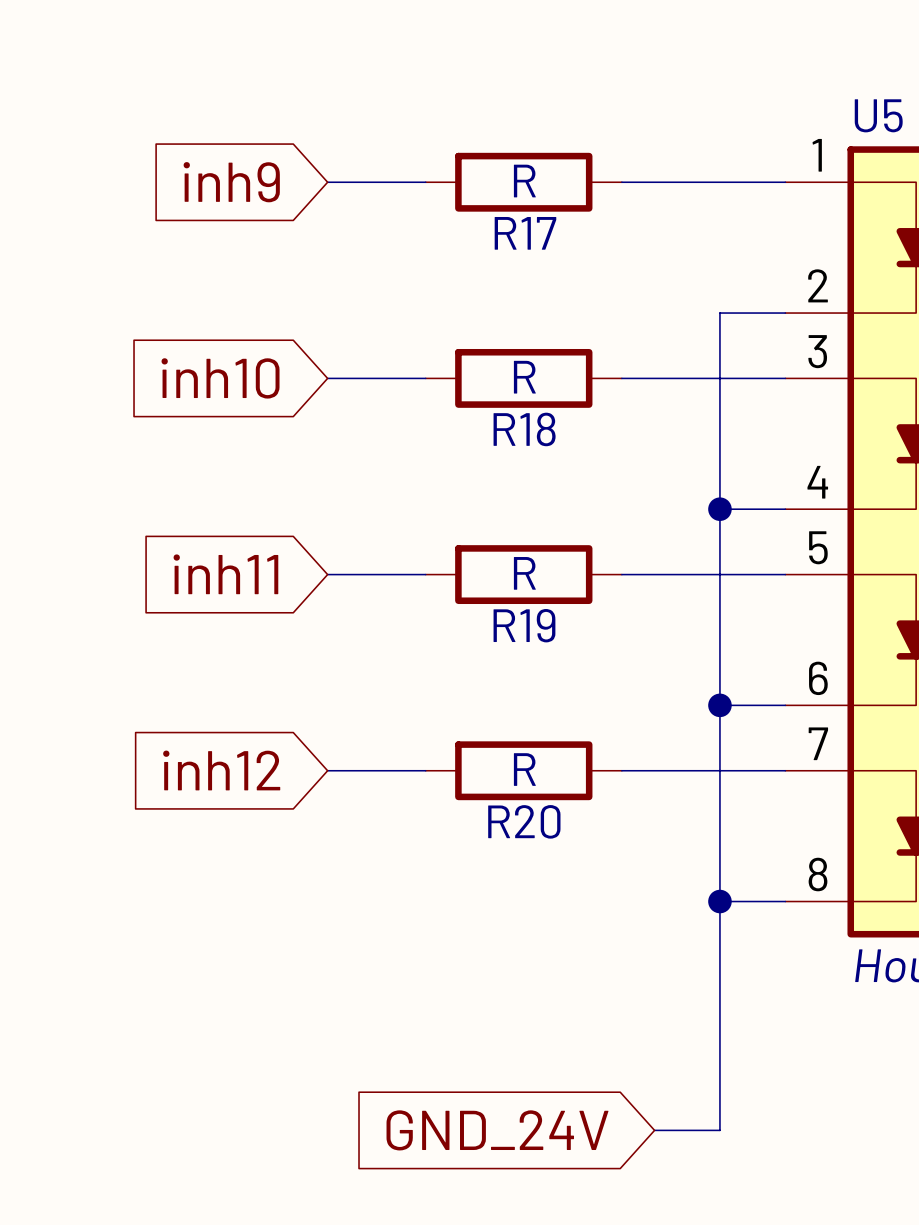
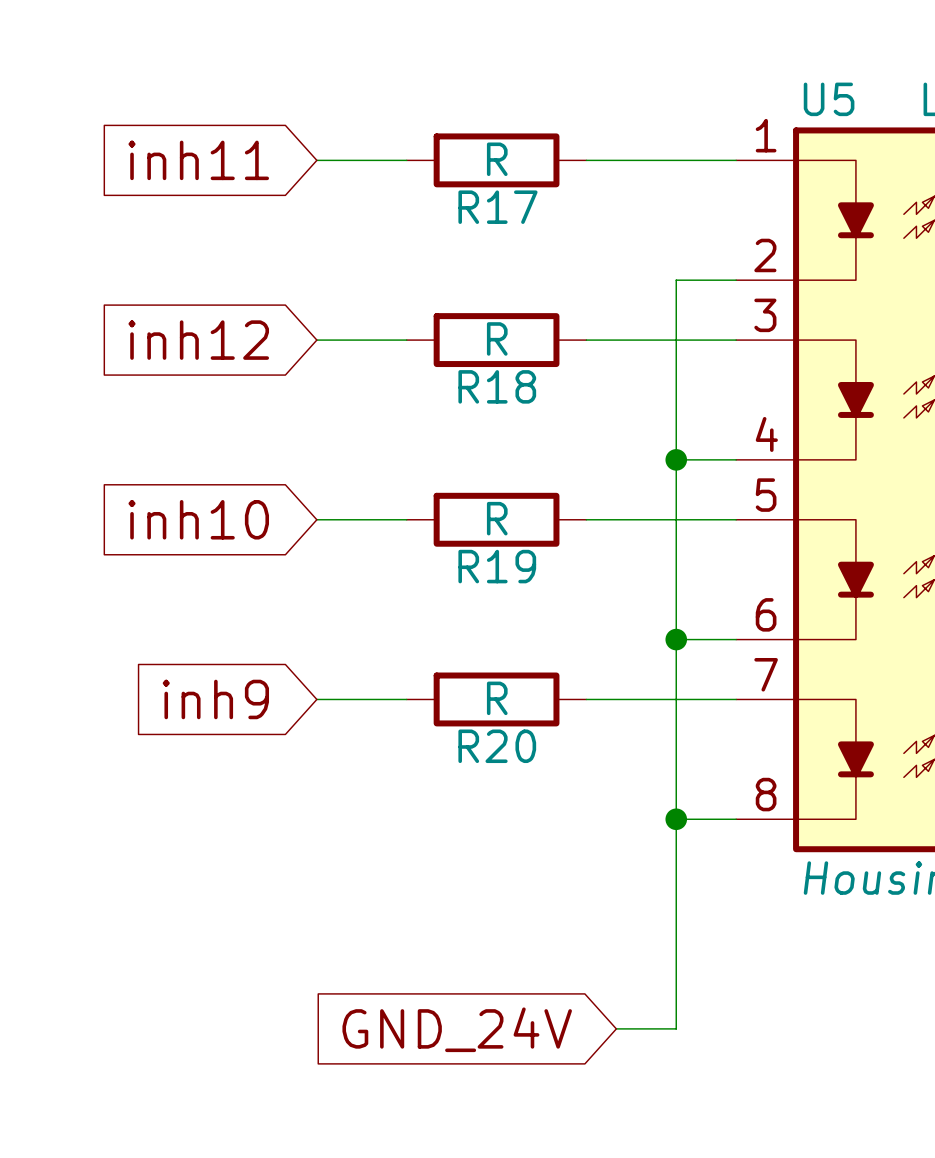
global label: inh9 (231, 182) -> inh11 (198, 160)
global label: inh10 (220, 378) -> inh12 (198, 340)
global label: inh11 (225, 574) -> inh10 (198, 519)
global label: inh12 (221, 770) -> inh9 (215, 699)

